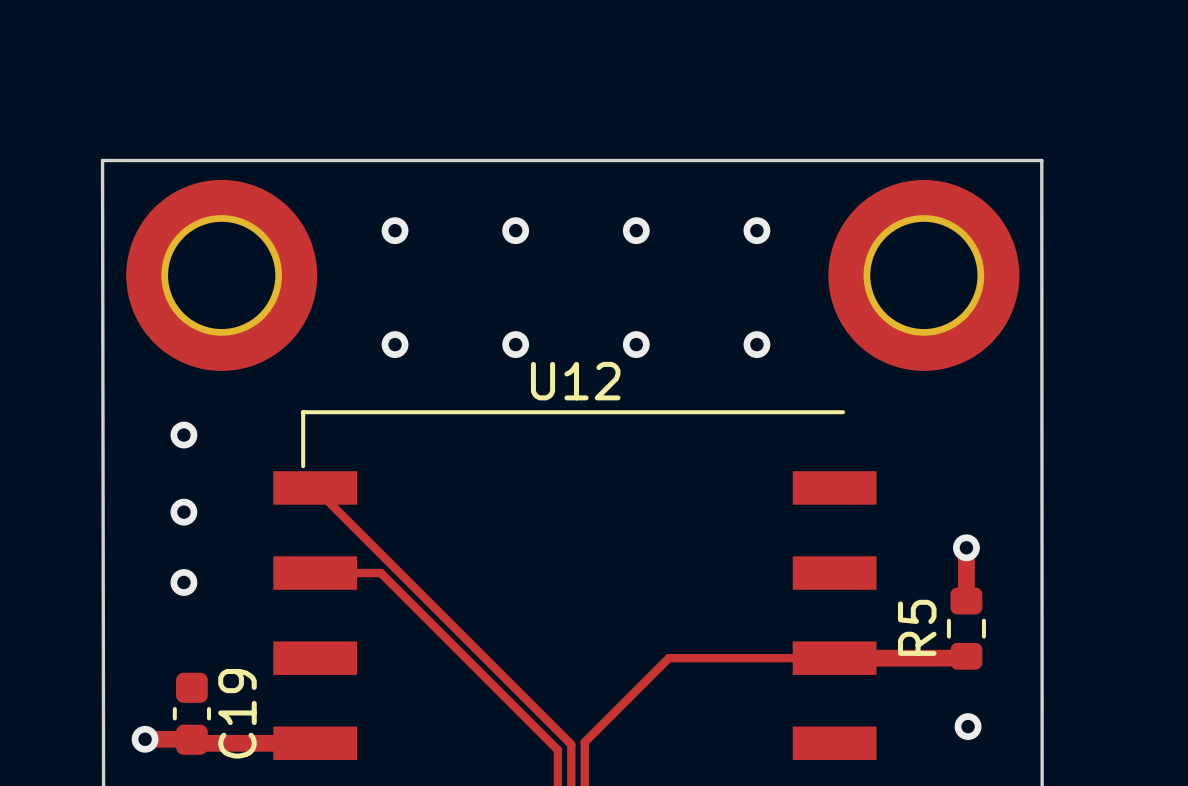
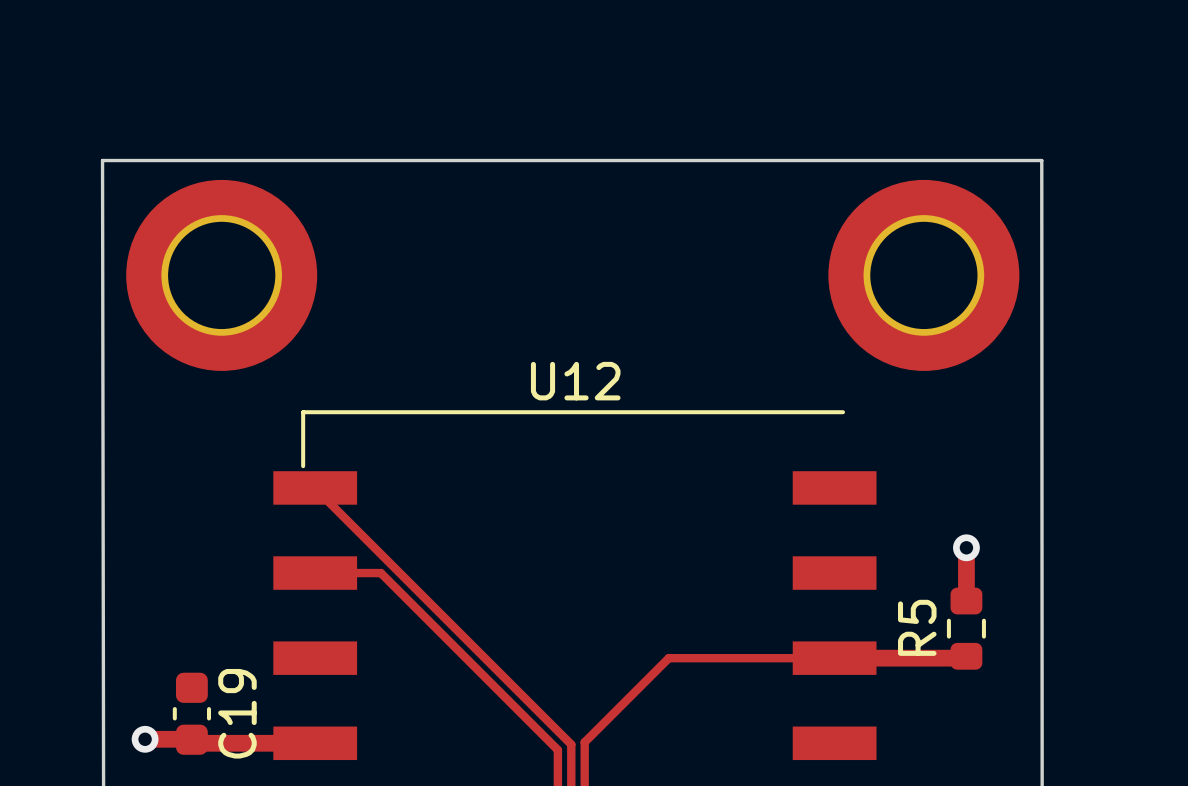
via: (395, 230) -> none
via: (515, 230) -> none
via: (636, 230) -> none
via: (756, 230) -> none
via: (395, 344) -> none
via: (515, 344) -> none
via: (636, 344) -> none
via: (756, 344) -> none
via: (183, 435) -> none
via: (183, 512) -> none
via: (183, 582) -> none
via: (968, 726) -> none

